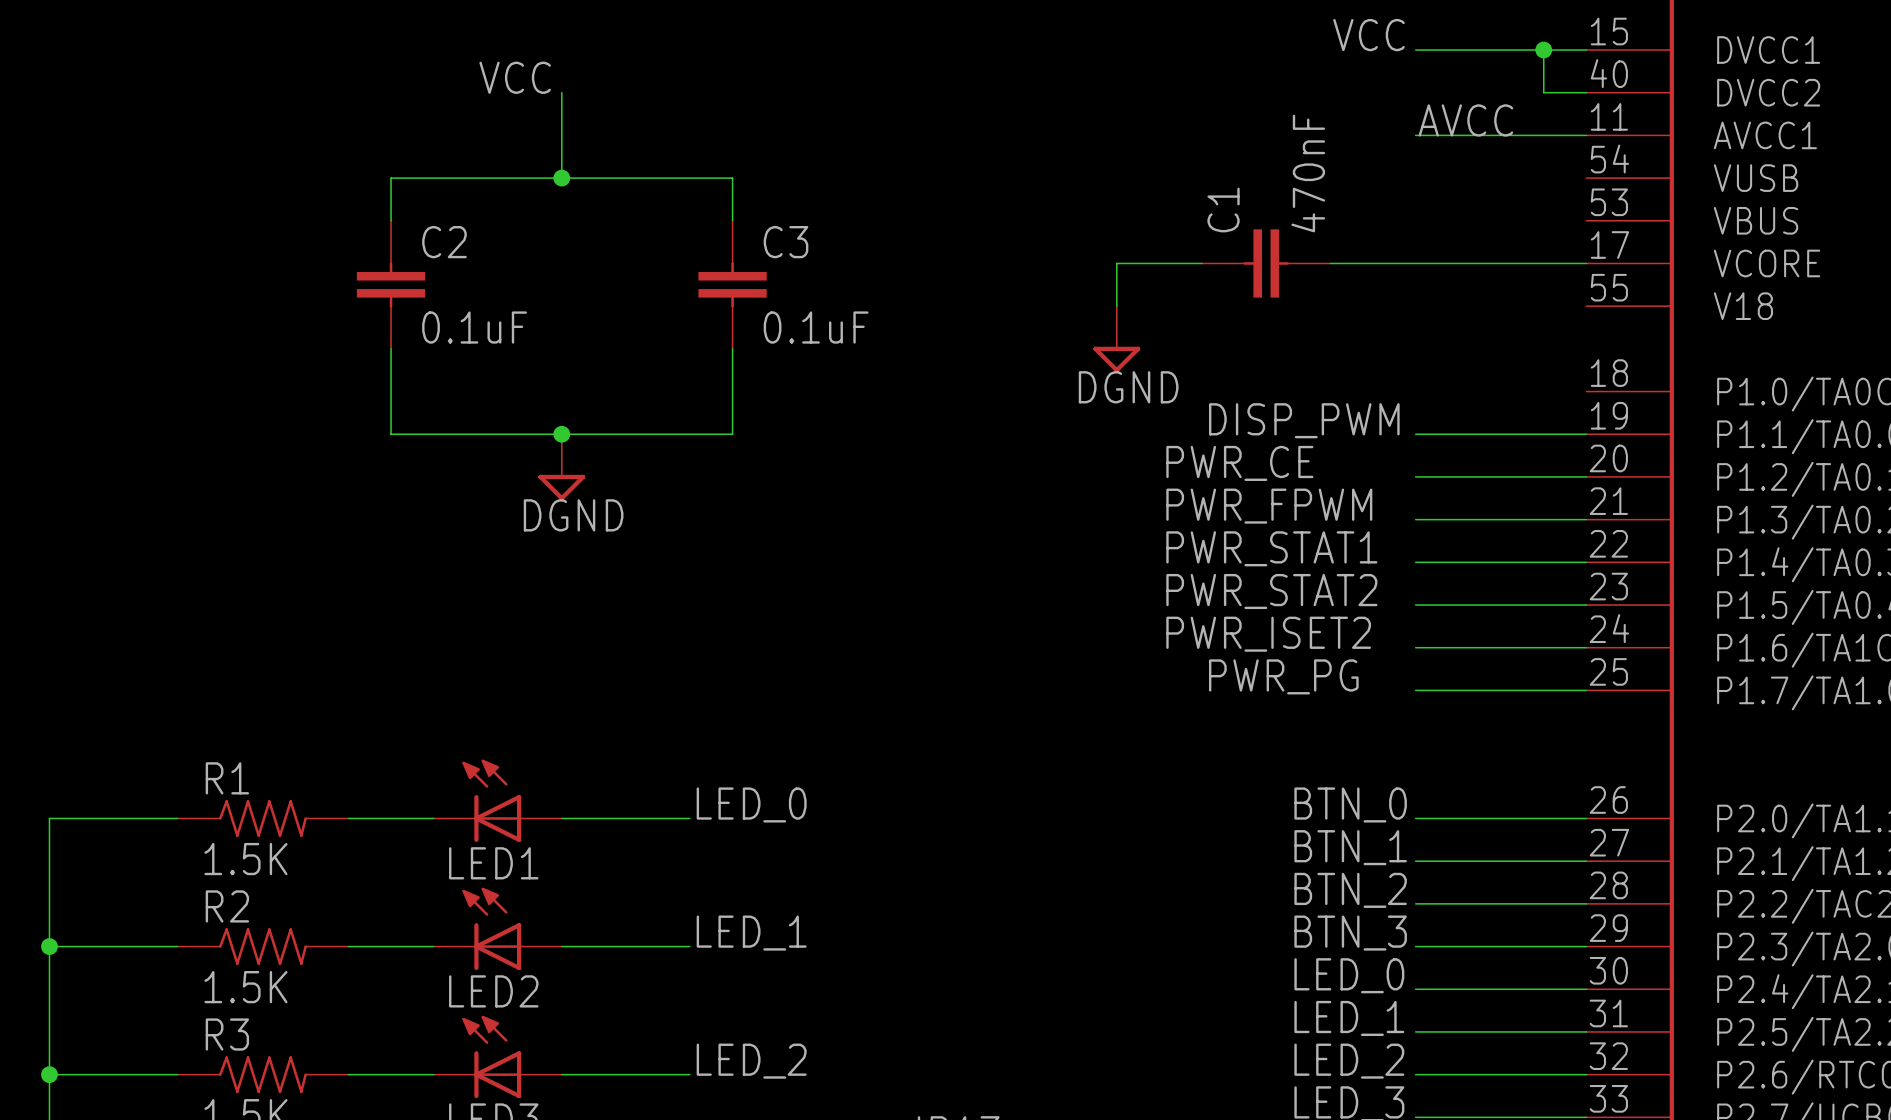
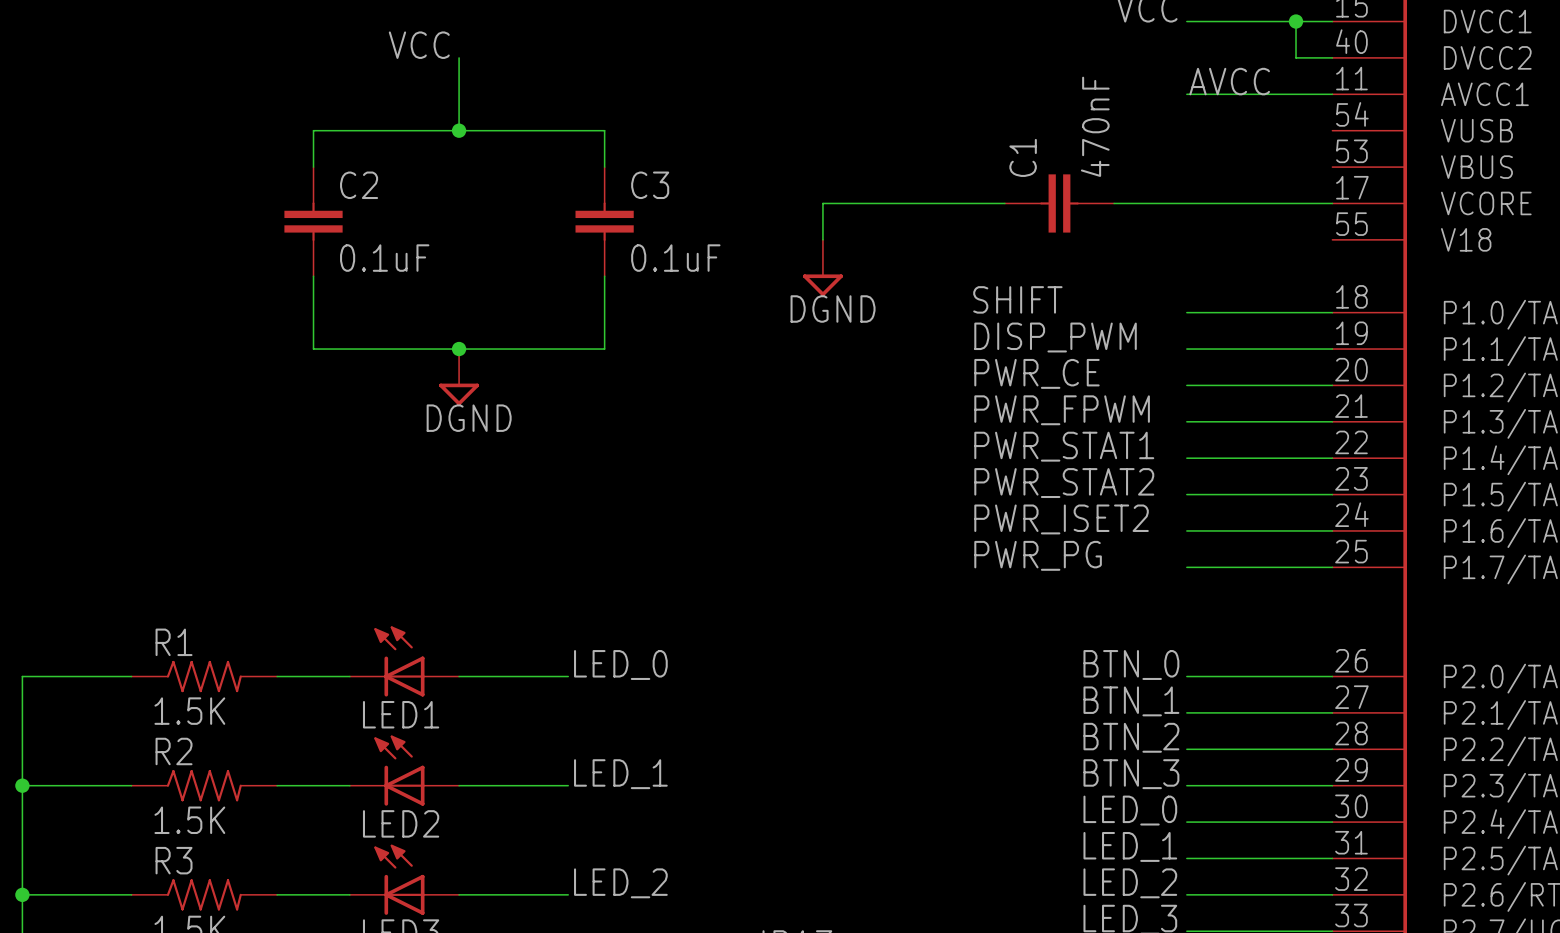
wire: (1116, 263) (1116, 306) -> (932, 203) (822, 203) (822, 239)
power symbol position: DGND (1116, 339) -> DGND (822, 268)
label: none -> SHIFT (1017, 299)
wire: none -> (1186, 312) (1332, 312)
label position: DISP_PWM (1304, 420) -> DISP_PWM (1055, 337)
label position: PWR_PG (1283, 676) -> PWR_PG (1038, 555)

